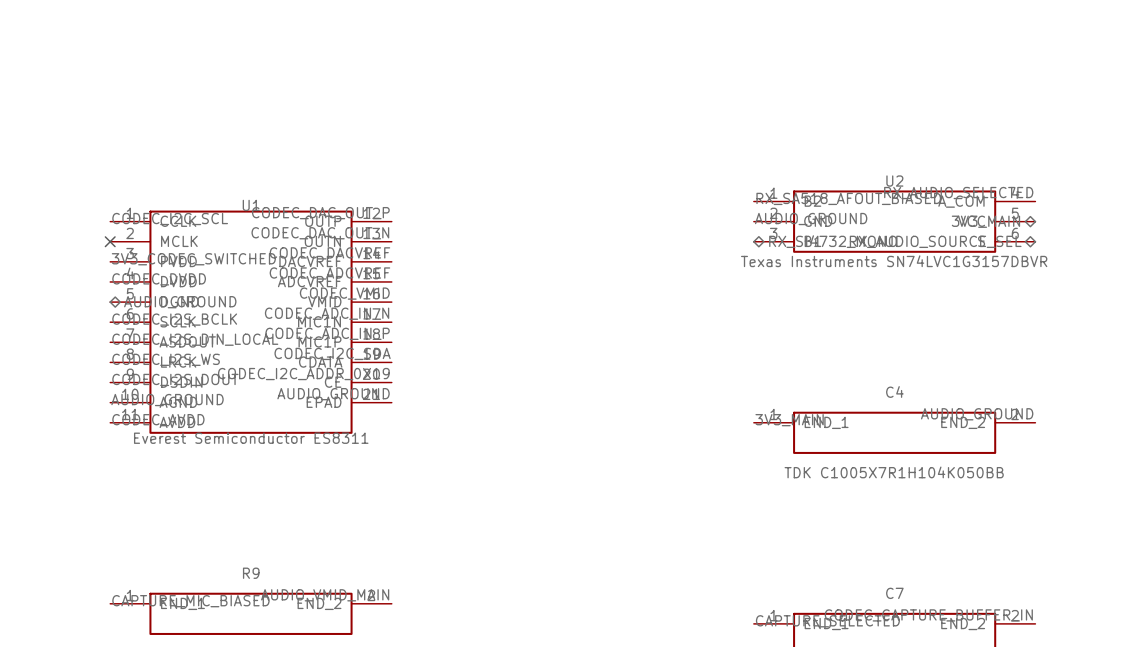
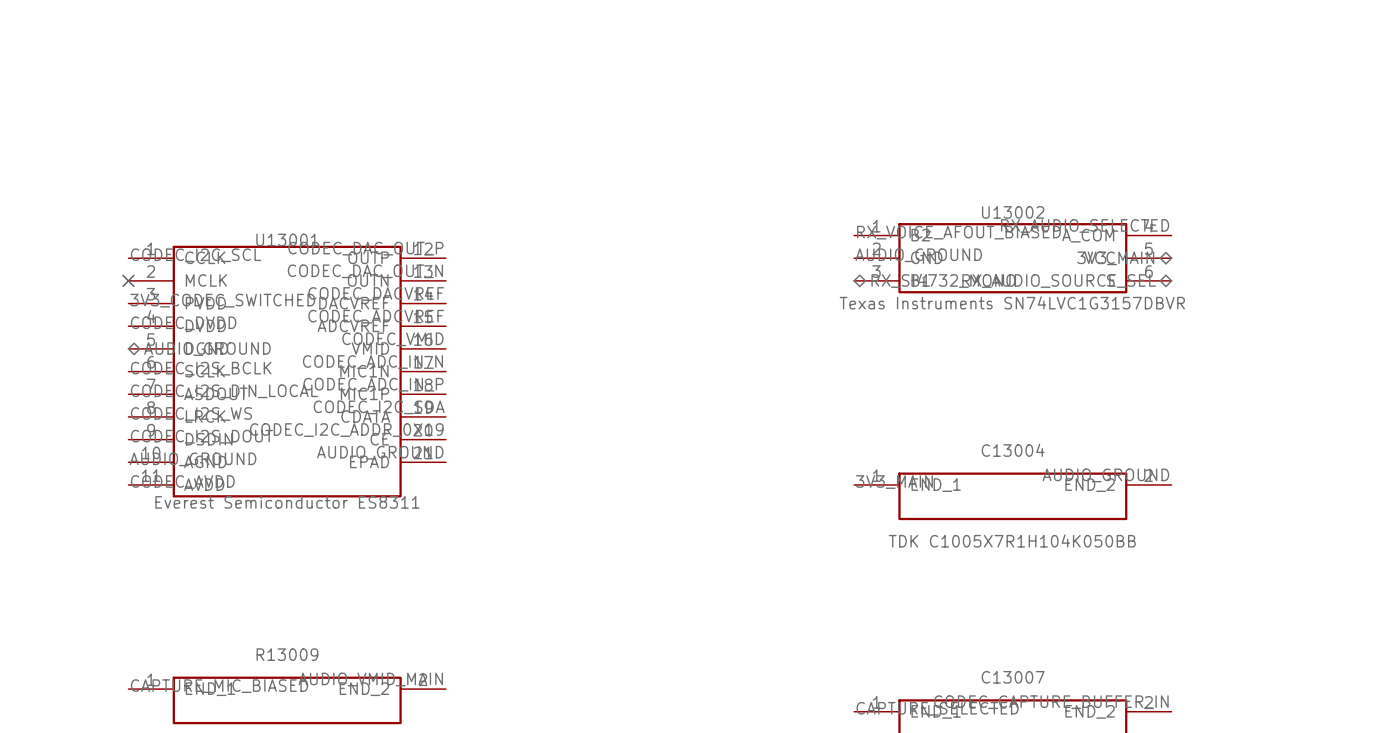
U2 name: U2 (894, 181) -> U13002 (1013, 212)
label: RX_SA518_AFOUT_BIASED (848, 198) -> RX_VOICE_AFOUT_BIASED (958, 232)
U1 name: U1 (251, 205) -> U13001 (287, 239)
C4 name: C4 (894, 391) -> C13004 (1013, 450)
R9 name: R9 (251, 573) -> R13009 (287, 654)
C7 name: C7 (894, 593) -> C13007 (1013, 677)

